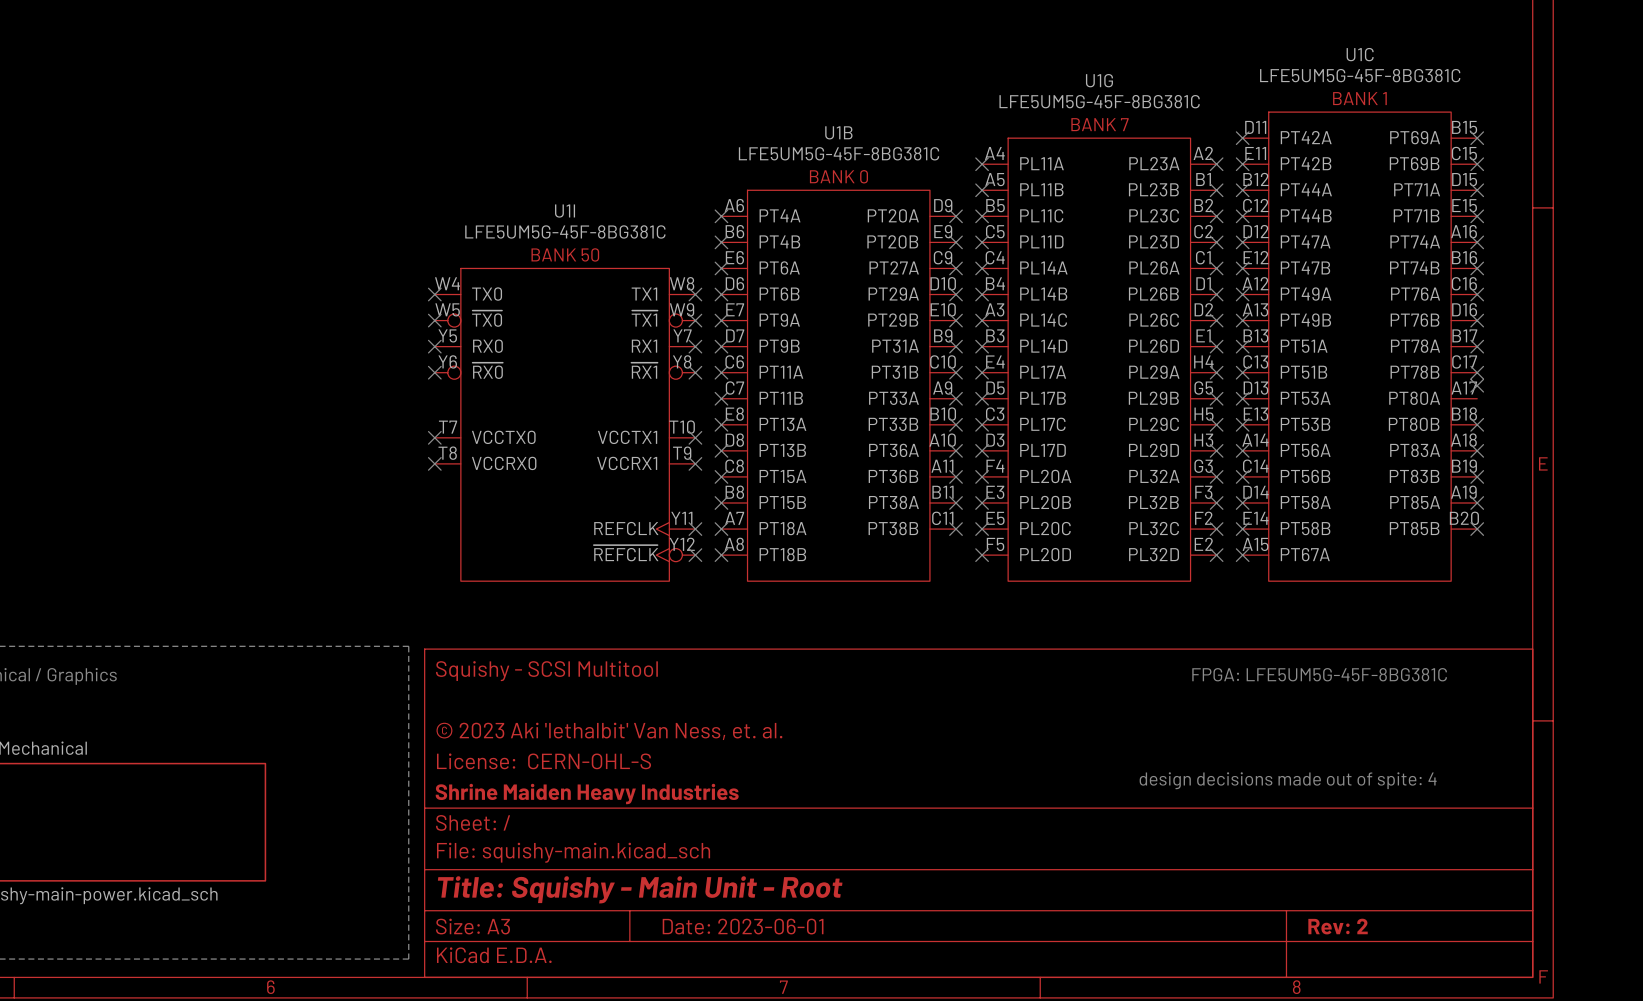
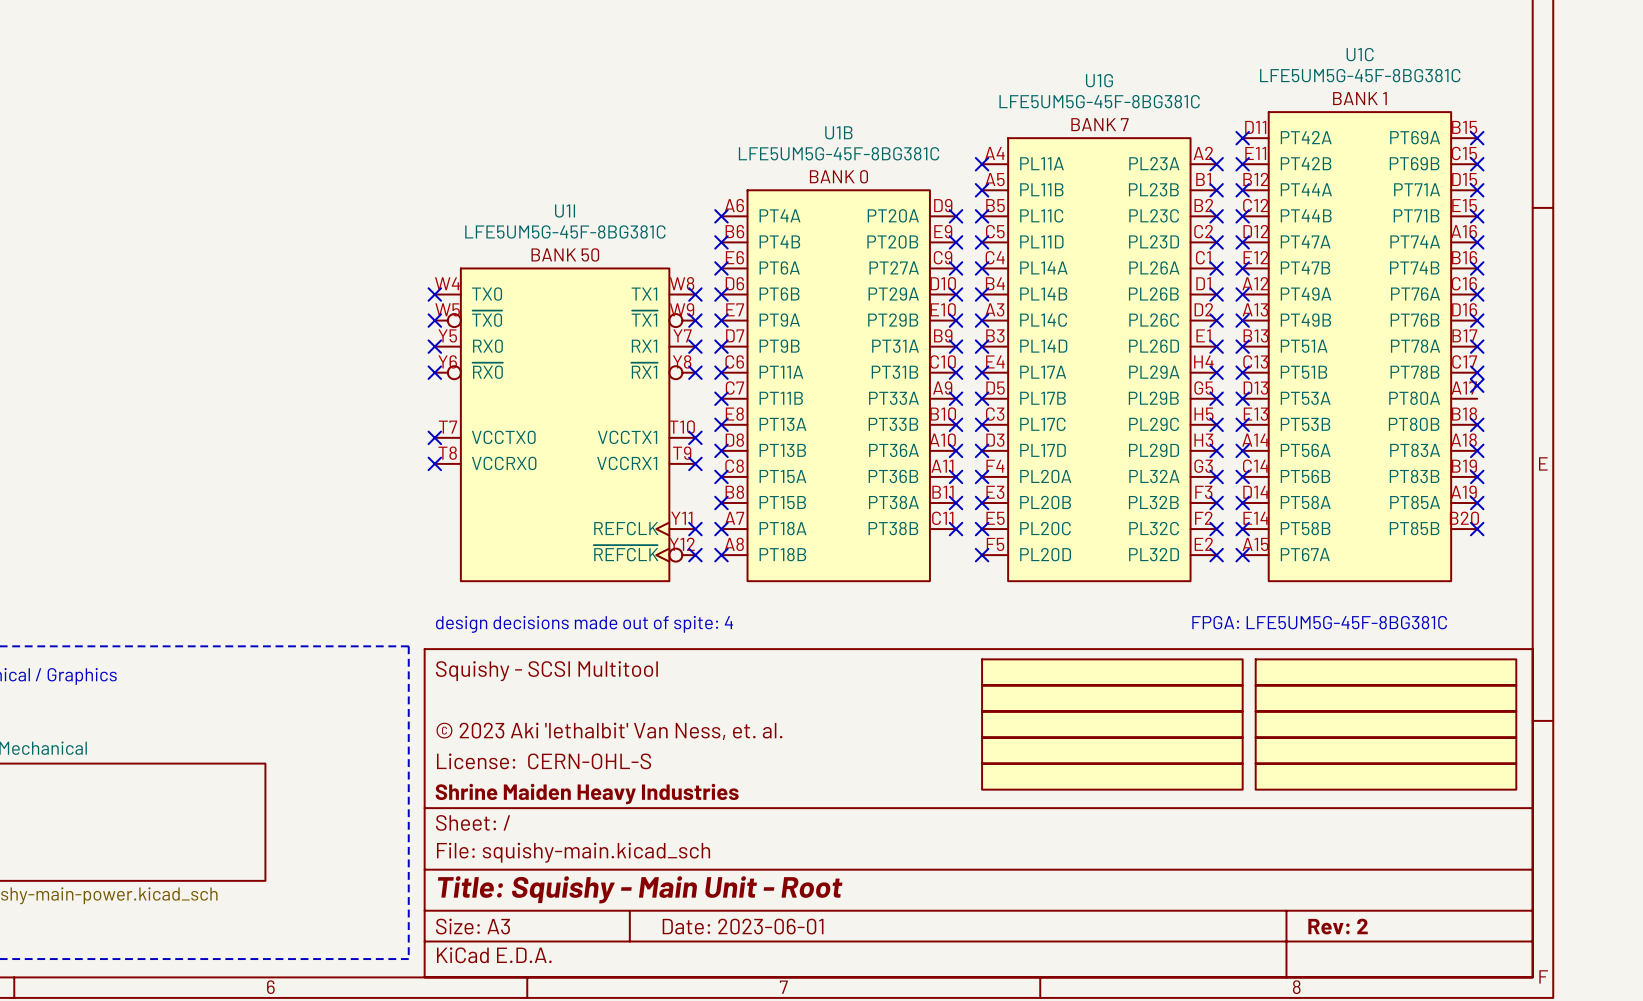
text: none -> design decisions made out of spite: 4 (584, 624)
text position: FPGA: LFE5UM5G-45F-8BG381C (1319, 674) -> FPGA: LFE5UM5G-45F-8BG381C (1319, 622)
part: none -> (1112, 724)
part: none -> (1386, 724)
text: design decisions made out of spite: 4 (1288, 780) -> none

